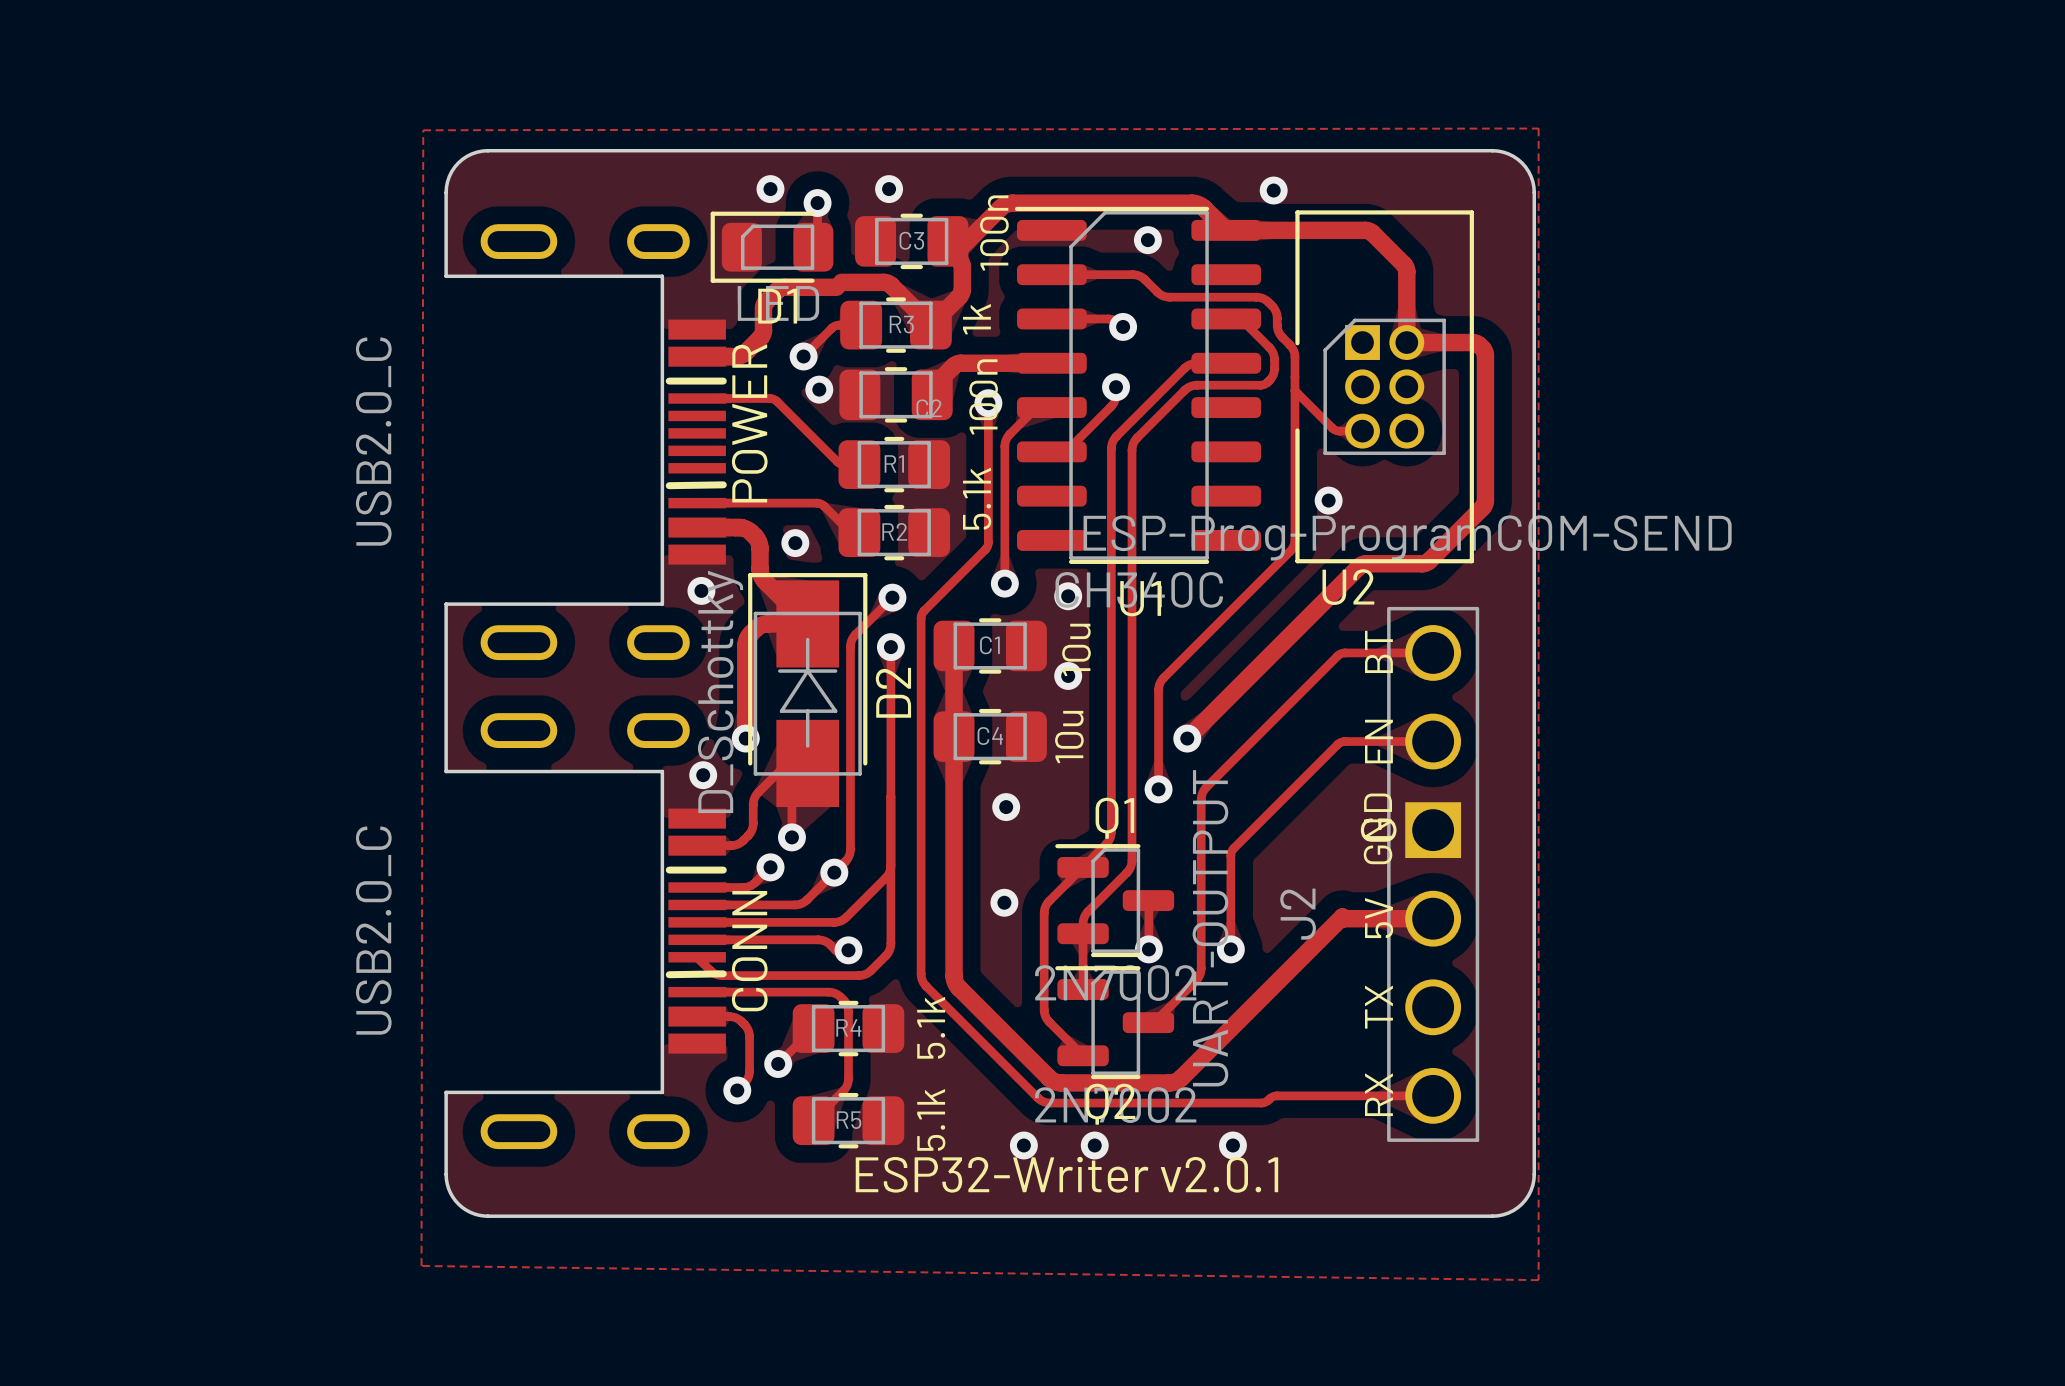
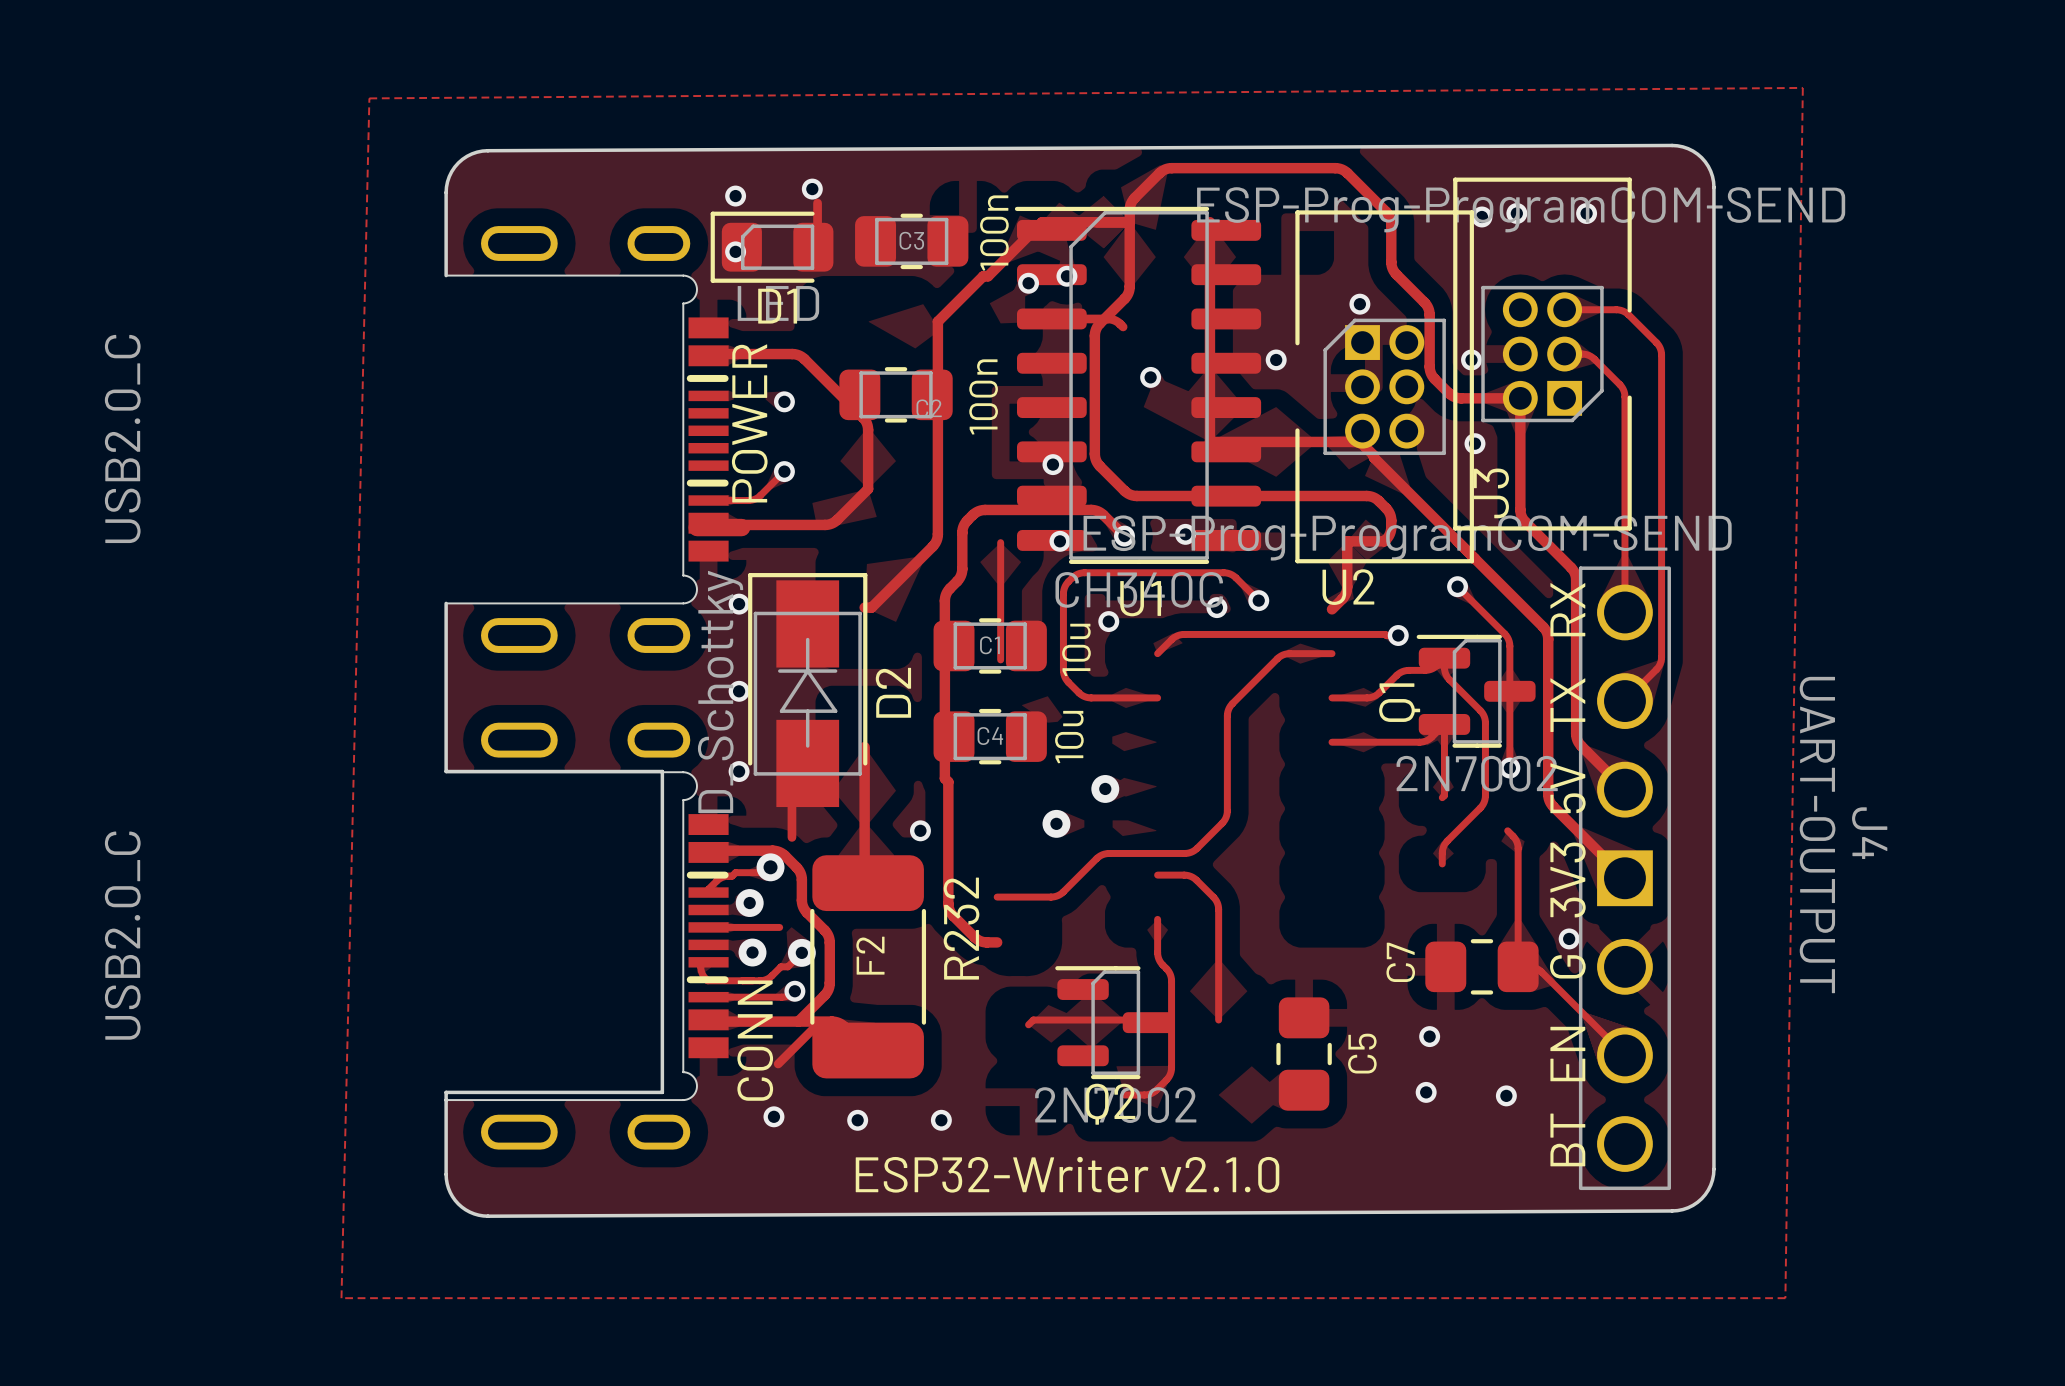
zone outline: (1538, 128) (423, 130) (421, 1265) (1538, 1280) (1538, 128) -> (1802, 87) (369, 98) (341, 1298) (1785, 1298) (1802, 87)
board edge: (487, 150) (1492, 150) (1508, 153) (1522, 162) (1531, 176) (1534, 192) (1534, 1174) (1531, 1190) (1522, 1203) (1508, 1213) (1492, 1216) (487, 1216) -> (487, 150) (1672, 145) (1688, 148) (1701, 157) (1710, 171) (1713, 187) (1713, 1169) (1708, 1190) (1697, 1202) (1688, 1207) (1672, 1210) (487, 1216)
via: (770, 189) -> none
via: (889, 189) -> none
via: (1273, 190) -> none
via: none -> (735, 196)
via position: (817, 203) -> (812, 189)
via: none -> (1516, 213)
via: none -> (1586, 213)
via: none -> (1481, 216)
track: none -> (1129, 222) (1042, 222) (988, 276) (983, 276) (937, 321) (937, 538) (932, 546) (871, 607) (864, 607)
track: none -> (1209, 222) (1209, 441) (1353, 441) (1361, 444) (1543, 626) (1548, 639) (1548, 798) (1553, 806) (1624, 878)
part footprint: [480, 224, 727, 661] -> [445, 226, 729, 653]
via: (1147, 240) -> none
track: (947, 248) (961, 264) (962, 291) (959, 296) (930, 325) (888, 283) (841, 282) -> none
track: (959, 249) (1001, 206) (1012, 203) (1193, 203) (1202, 207) (1226, 230) (1367, 230) (1372, 233) (1406, 268) (1406, 342) (1473, 342) (1479, 344) (1484, 351) (1485, 500) (1483, 507) (1427, 562) (1365, 563) (1359, 566) (1187, 738) -> none
via: none -> (735, 251)
track: (1051, 274) (1136, 275) (1143, 278) (1159, 293) (1167, 297) (1261, 297) (1274, 309) (1278, 331) (1294, 352) (1294, 544) (1289, 551) (1160, 681) (1158, 690) (1158, 789) -> none
board edge: (446, 275) (662, 276) (662, 604) (446, 604) -> none
via: none -> (1066, 276)
via: none -> (1028, 283)
track: (836, 287) (779, 288) (764, 304) (762, 335) (745, 353) (736, 356) (697, 356) -> none
via: none -> (1359, 304)
track: none -> (1564, 309) (1623, 311) (1656, 342) (1661, 351) (1661, 659) (1656, 669) (1624, 701)
track: (1226, 318) (1237, 319) (1243, 321) (1270, 349) (1274, 359) (1274, 371) (1271, 377) (1261, 385) (1197, 385) (1188, 387) (1137, 437) (1132, 445) (1131, 862) (1128, 871) (1084, 917) (1083, 989) -> none
track: (861, 325) (834, 326) (803, 356) -> none
R3: 1k (896, 325) -> none
via: (1123, 326) -> none
track: none -> (704, 354) (798, 355) (863, 417) (868, 429) (868, 489) (833, 522) (824, 524) (704, 524)
J3: none -> ESP-Prog-ProgramCOM-SEND (1542, 354)
track: none -> (1564, 354) (1584, 354) (1590, 356) (1619, 384) (1624, 393) (1624, 612)
via: (803, 356) -> none
via: none -> (1276, 359)
via: none -> (1471, 359)
track: (1051, 363) (957, 363) (934, 385) (932, 394) -> none
track: (1226, 363) (1195, 363) (1187, 366) (1116, 436) (1111, 444) (1111, 833) (1106, 844) (1048, 902) (1044, 913) (1044, 1014) (1049, 1022) (1083, 1055) -> none
via: none -> (1150, 377)
track: (1116, 387) (1115, 399) (1110, 406) (1069, 448) (1063, 451) (1051, 451) -> none
via: (1116, 387) -> none
via: (819, 389) -> none
track: (1294, 390) (1334, 429) (1362, 431) -> none
track: (697, 398) (773, 399) (837, 462) (843, 464) (859, 464) -> none
via: none -> (784, 401)
track: (988, 403) (987, 545) (924, 610) (921, 617) (921, 973) (924, 983) (1037, 1097) (1045, 1102) (1261, 1103) (1277, 1095) (1433, 1095) -> none
via: (988, 403) -> none
track: (1051, 407) (1040, 407) (1034, 410) (1009, 434) (1005, 441) (1004, 583) -> none
part value position: USB2.0_C (373, 441) -> USB2.0_C (122, 438)
via: none -> (1474, 443)
R1: (894, 464) -> none
via: none -> (1052, 464)
track: none -> (784, 471) (754, 499) (704, 500)
via: none -> (784, 471)
via: (1328, 500) -> none
track: (697, 503) (818, 503) (849, 530) (859, 532) -> none
track: (739, 527) (748, 530) (758, 541) (760, 570) (762, 578) (807, 623) (764, 624) (756, 627) (748, 637) (745, 646) (745, 738) -> none
R2: 5.1k (894, 532) -> none
via: none -> (1185, 534)
track: none -> (1124, 536) (1102, 513) (1092, 510) (982, 510) (972, 515) (963, 527) (961, 573) (947, 591) (944, 600) (944, 778) (948, 781) (948, 906) (951, 914) (975, 938) (983, 942) (997, 942)
via: none -> (1124, 536)
via: none -> (1059, 541)
track: none -> (1000, 542) (1000, 659)
via: (795, 543) -> none
via: (1004, 583) -> none
track: none -> (1457, 586) (1504, 633) (1509, 641) (1509, 768)
via: none -> (1457, 586)
via: (701, 590) -> none
via: (1068, 596) -> none
track: (892, 597) (855, 634) (850, 643) (850, 849) (848, 857) (807, 899) (799, 904) (697, 904) -> none
via: (892, 597) -> none
track: none -> (1258, 600) (1234, 576) (1225, 572) (1084, 572) (1072, 577) (1066, 584) (1063, 592) (1063, 670) (1067, 680) (1080, 693) (1087, 697) (1157, 697)
via: none -> (1258, 600)
via: none -> (739, 604)
via: none -> (1216, 607)
track: none -> (1332, 609) (1343, 597) (1346, 590) (1347, 541) (1384, 541) (1389, 533) (1389, 513) (1376, 498) (1366, 496) (1134, 495) (1124, 490) (1096, 460) (1095, 331) (1098, 325) (1124, 298) (1128, 291) (1131, 203) (1165, 169) (1339, 168) (1347, 173) (1388, 214) (1391, 222) (1392, 268) (1425, 303) (1428, 309) (1429, 366) (1433, 377) (1450, 394) (1457, 398) (1520, 398) (1520, 514) (1525, 522) (1572, 568) (1575, 576) (1576, 738) (1581, 745) (1624, 789)
via: none -> (1108, 621)
track: none -> (1398, 635) (1181, 634) (1173, 638) (1157, 653)
via: none -> (1398, 635)
track: (954, 645) (954, 980) (959, 987) (1053, 1080) (1061, 1082) (1175, 1081) (1342, 916) (1344, 918) (1433, 918) -> none
track: (890, 647) (890, 943) (888, 952) (869, 971) (858, 975) (720, 975) (712, 971) (697, 957) -> none
via: (890, 647) -> none
track: (1433, 652) (1340, 654) (1204, 789) (1201, 799) (1200, 971) (1196, 980) (1157, 1019) (1148, 1022) -> none
track: none -> (1332, 653) (1289, 653) (1280, 655) (1230, 706) (1227, 715) (1226, 815) (1222, 823) (1194, 850) (1184, 853) (1104, 854) (1096, 858) (1057, 895) (997, 897)
via: (1068, 675) -> none
via: none -> (739, 691)
track: none -> (1332, 697) (1372, 697) (1378, 693) (1400, 672) (1406, 670) (1430, 669) (1444, 658) (1444, 669) (1448, 678) (1482, 713) (1485, 722) (1484, 800) (1480, 808) (1445, 843) (1442, 851) (1442, 863)
part footprint: [480, 713, 727, 1150] -> [445, 722, 729, 1150]
via: (745, 738) -> none
via: (1187, 738) -> none
track: (1433, 741) (1340, 742) (1233, 848) (1230, 855) (1230, 949) -> none
track: none -> (1332, 742) (1422, 741) (1430, 738) (1444, 724) (1444, 795) (1442, 797)
track: none -> (864, 747) (864, 879) (868, 883)
track: (807, 763) (787, 763) (757, 793) (753, 803) (752, 827) (742, 841) (732, 845) (697, 845) -> none
via: none -> (1509, 768)
via: none -> (739, 771)
via: (703, 775) -> none
via: none -> (1105, 788)
via: (1158, 789) -> none
via: (1006, 807) -> none
Q1 name rotation: 0° (1114, 818) -> 90° counterclockwise (1399, 702)
Q1 name position: Q1 (1114, 818) -> Q1 (1399, 702)
via: none -> (1056, 823)
via: none -> (920, 830)
track: none -> (1507, 830) (1515, 838) (1518, 846) (1518, 966) (1532, 967) (1540, 970) (1624, 1055)
via: (791, 837) -> none
track: none -> (704, 850) (777, 851) (785, 855) (799, 871) (803, 906) (829, 937) (829, 982) (826, 993) (798, 1021)
track: (890, 865) (885, 877) (846, 917) (839, 921) (697, 922) -> none
track: (770, 867) (753, 883) (747, 886) (697, 887) -> none
track: none -> (769, 872) (735, 872) (732, 876) (718, 879) (708, 889) (708, 892)
via: (834, 872) -> none
J2: UART-OUTPUT (1433, 874) -> none
track: none -> (1157, 875) (1190, 876) (1217, 902) (1218, 1020)
J4: none -> UART-OUTPUT (1624, 878)
Q1 position: (1114, 900) -> (1476, 691)
track: (1148, 901) (1148, 949) -> none
via: (1004, 902) -> none
via: none -> (749, 903)
track: none -> (1157, 919) (1158, 957) (1169, 972) (1171, 979) (1171, 1070) (1167, 1078) (1152, 1092) (1124, 1095)
track: none -> (704, 927) (779, 927)
text: none -> R232 (961, 928)
part value position: USB2.0_C (373, 930) -> USB2.0_C (122, 935)
via: none -> (1569, 938)
track: (697, 939) (819, 939) (827, 942) (835, 950) (848, 950) -> none
track: none -> (798, 949) (801, 952) (787, 966) (780, 966) (769, 977) (761, 980) (707, 980) (701, 969) (700, 965) (704, 962)
via: (1148, 949) -> none
via: (1230, 949) -> none
via: (848, 950) -> none
text position: CONN (749, 951) -> CONN (755, 1040)
via: none -> (752, 952)
via: none -> (801, 952)
F2: none -> (868, 966)
C7: none -> (1481, 966)
track: none -> (794, 991) (788, 995) (781, 997) (704, 997)
via: none -> (794, 991)
track: (697, 992) (830, 992) (836, 994) (843, 999) (848, 1012) (848, 1081) (844, 1089) (813, 1120) -> none
track: (697, 1016) (732, 1016) (740, 1020) (747, 1028) (749, 1036) (749, 1074) (745, 1082) (737, 1090) -> none
track: none -> (1124, 1020) (1033, 1020) (1028, 1024)
track: none -> (704, 1021) (835, 1021) (843, 1025) (868, 1050)
R4: 5.1k (848, 1028) -> none
via: none -> (1429, 1036)
C5: none -> (1304, 1054)
via: (778, 1063) -> none
via: (737, 1090) -> none
via: none -> (1426, 1092)
via: none -> (1506, 1095)
via: none -> (773, 1116)
R5: 5.1k (848, 1120) -> none
via: none -> (857, 1120)
via: none -> (941, 1120)
via: (1023, 1145) -> none
via: (1094, 1145) -> none
via: (1232, 1145) -> none
text: ESP32-Writer v2.0.1 (1066, 1174) -> ESP32-Writer v2.1.0 (1067, 1174)

